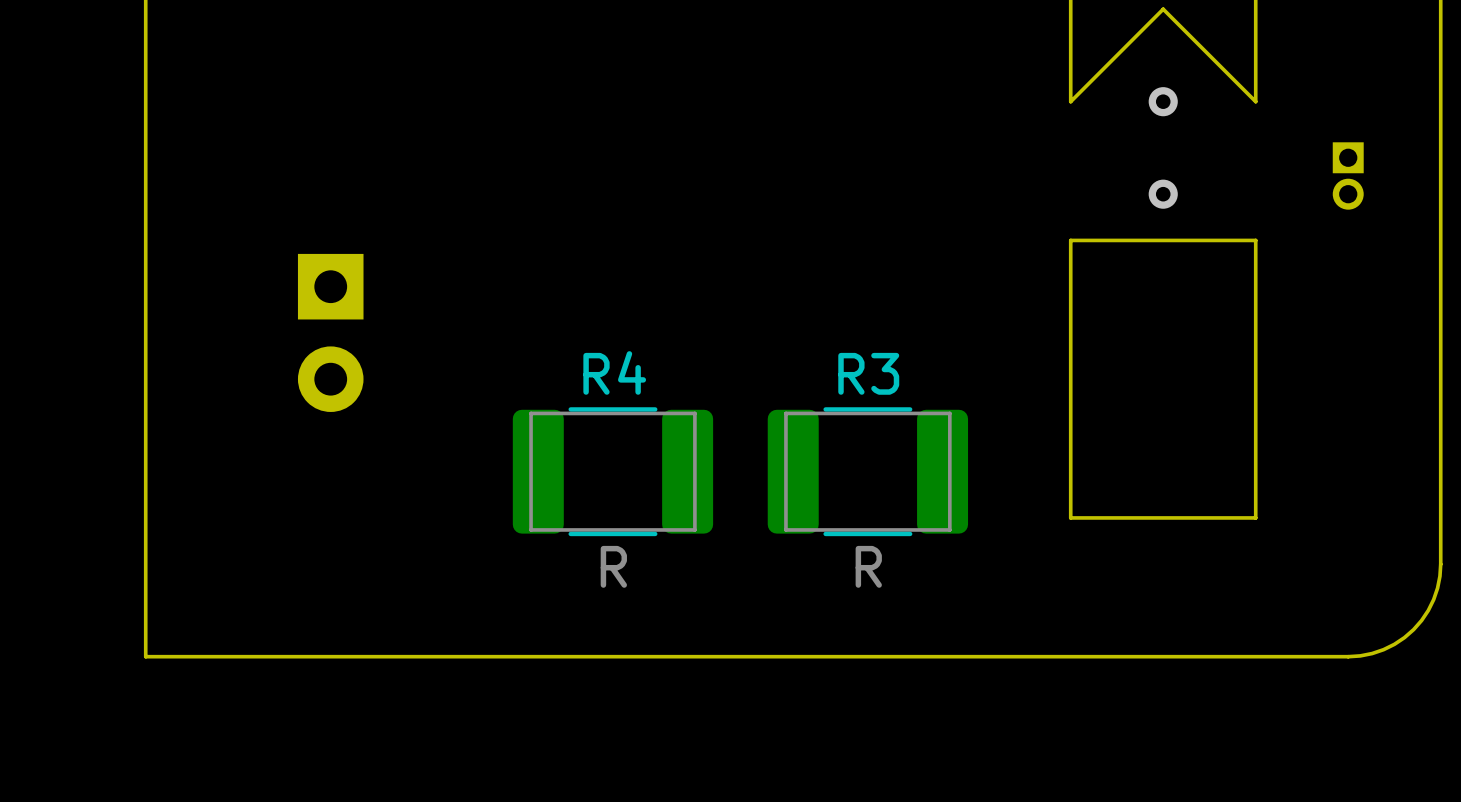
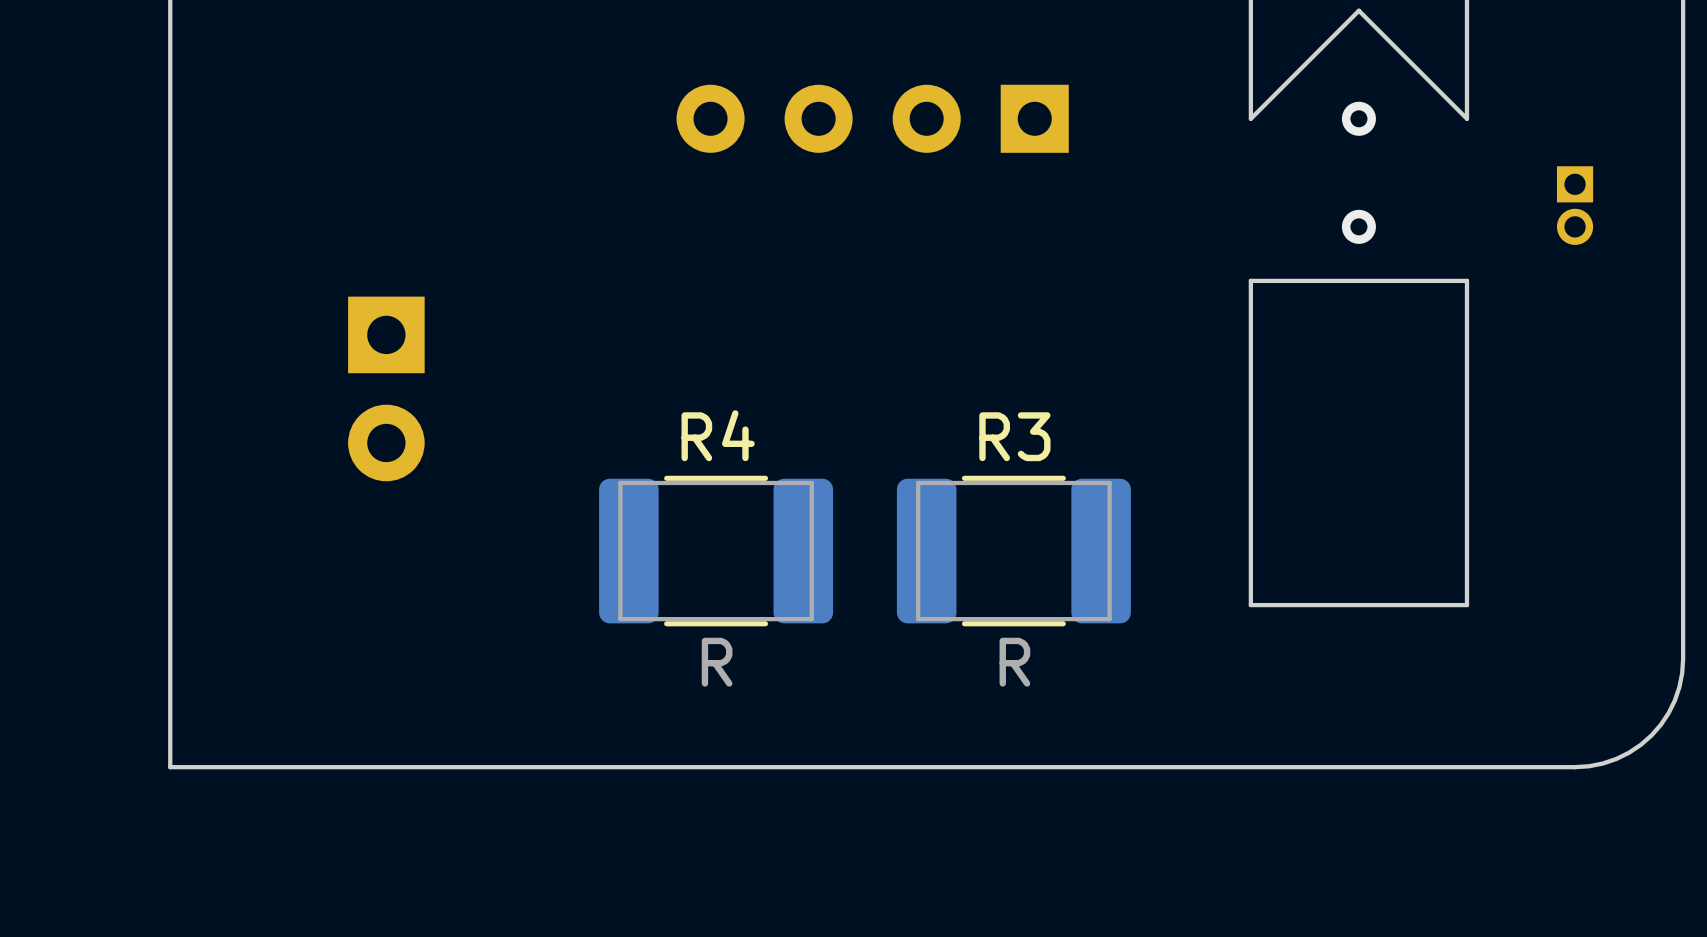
part: none -> (872, 118)

